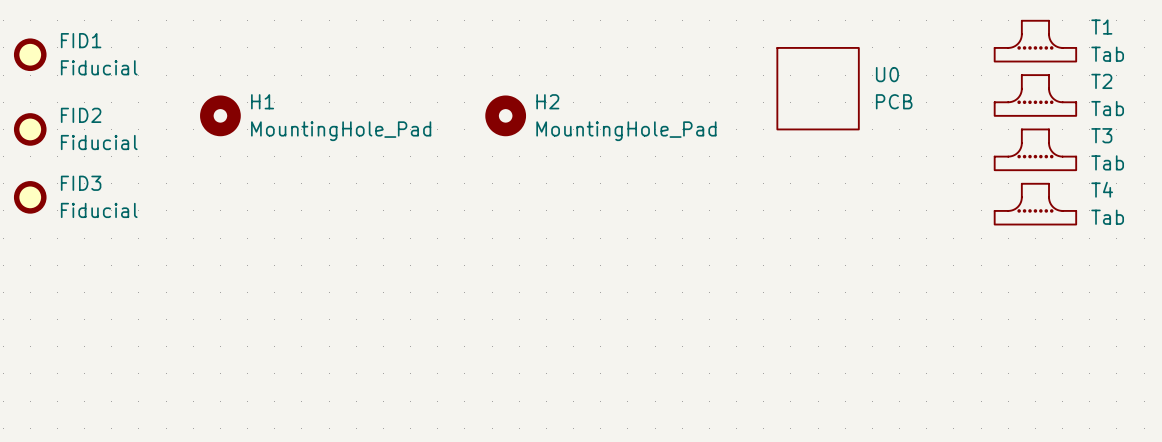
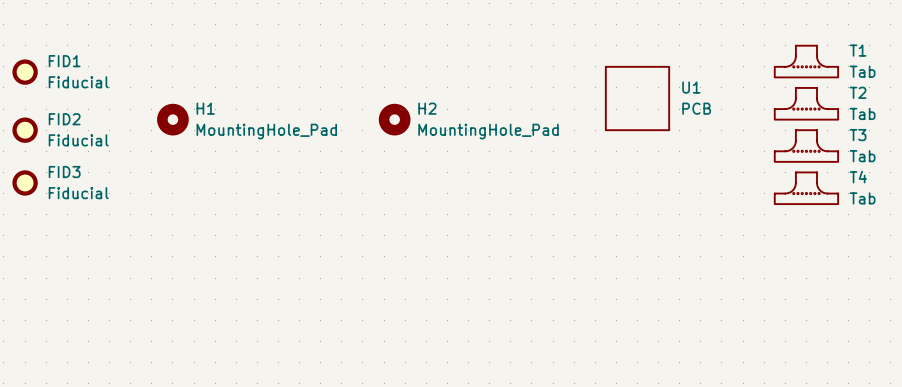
U0 name: U0 (887, 74) -> U1 (691, 87)

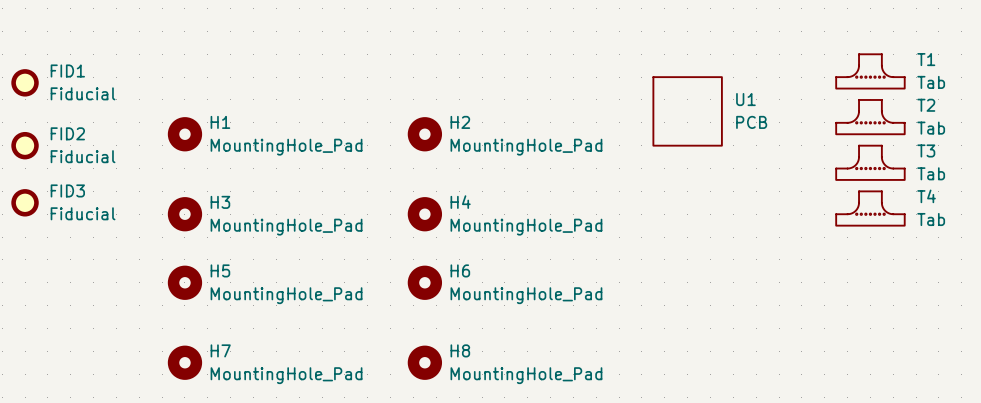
H3: none -> MountingHole_Pad (184, 214)
H4: none -> MountingHole_Pad (424, 214)
H5: none -> MountingHole_Pad (184, 282)
H6: none -> MountingHole_Pad (424, 282)
H7: none -> MountingHole_Pad (184, 362)
H8: none -> MountingHole_Pad (424, 362)

